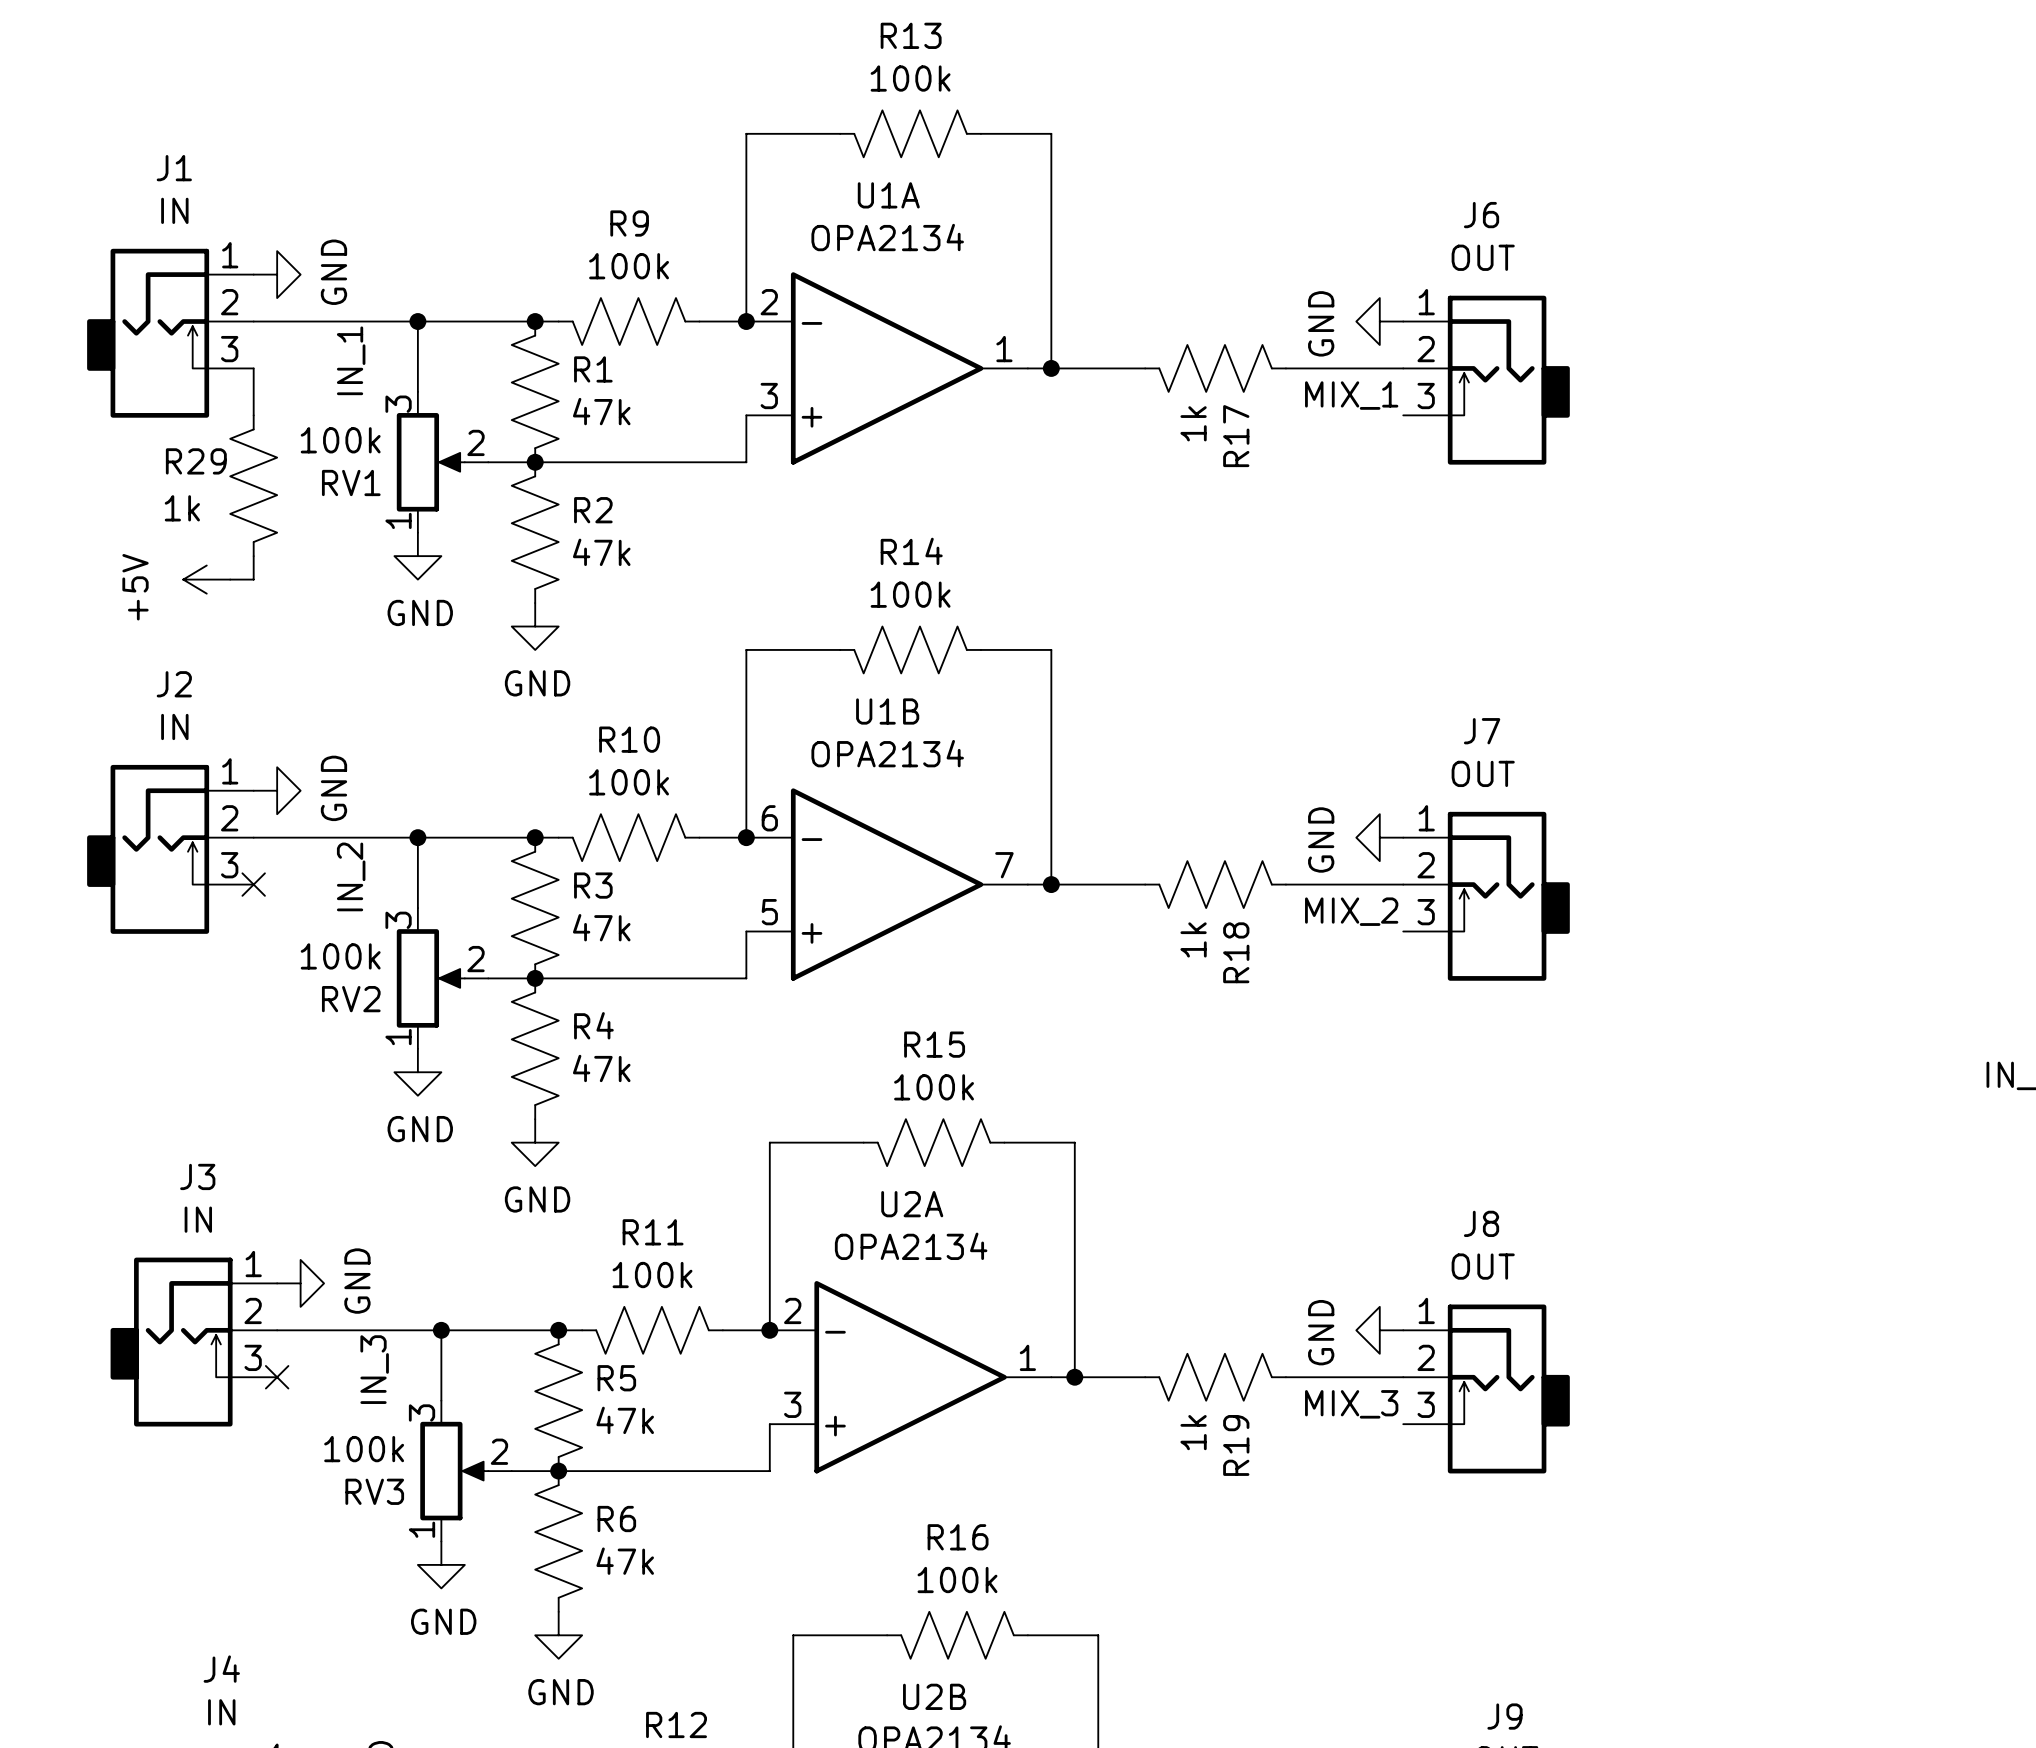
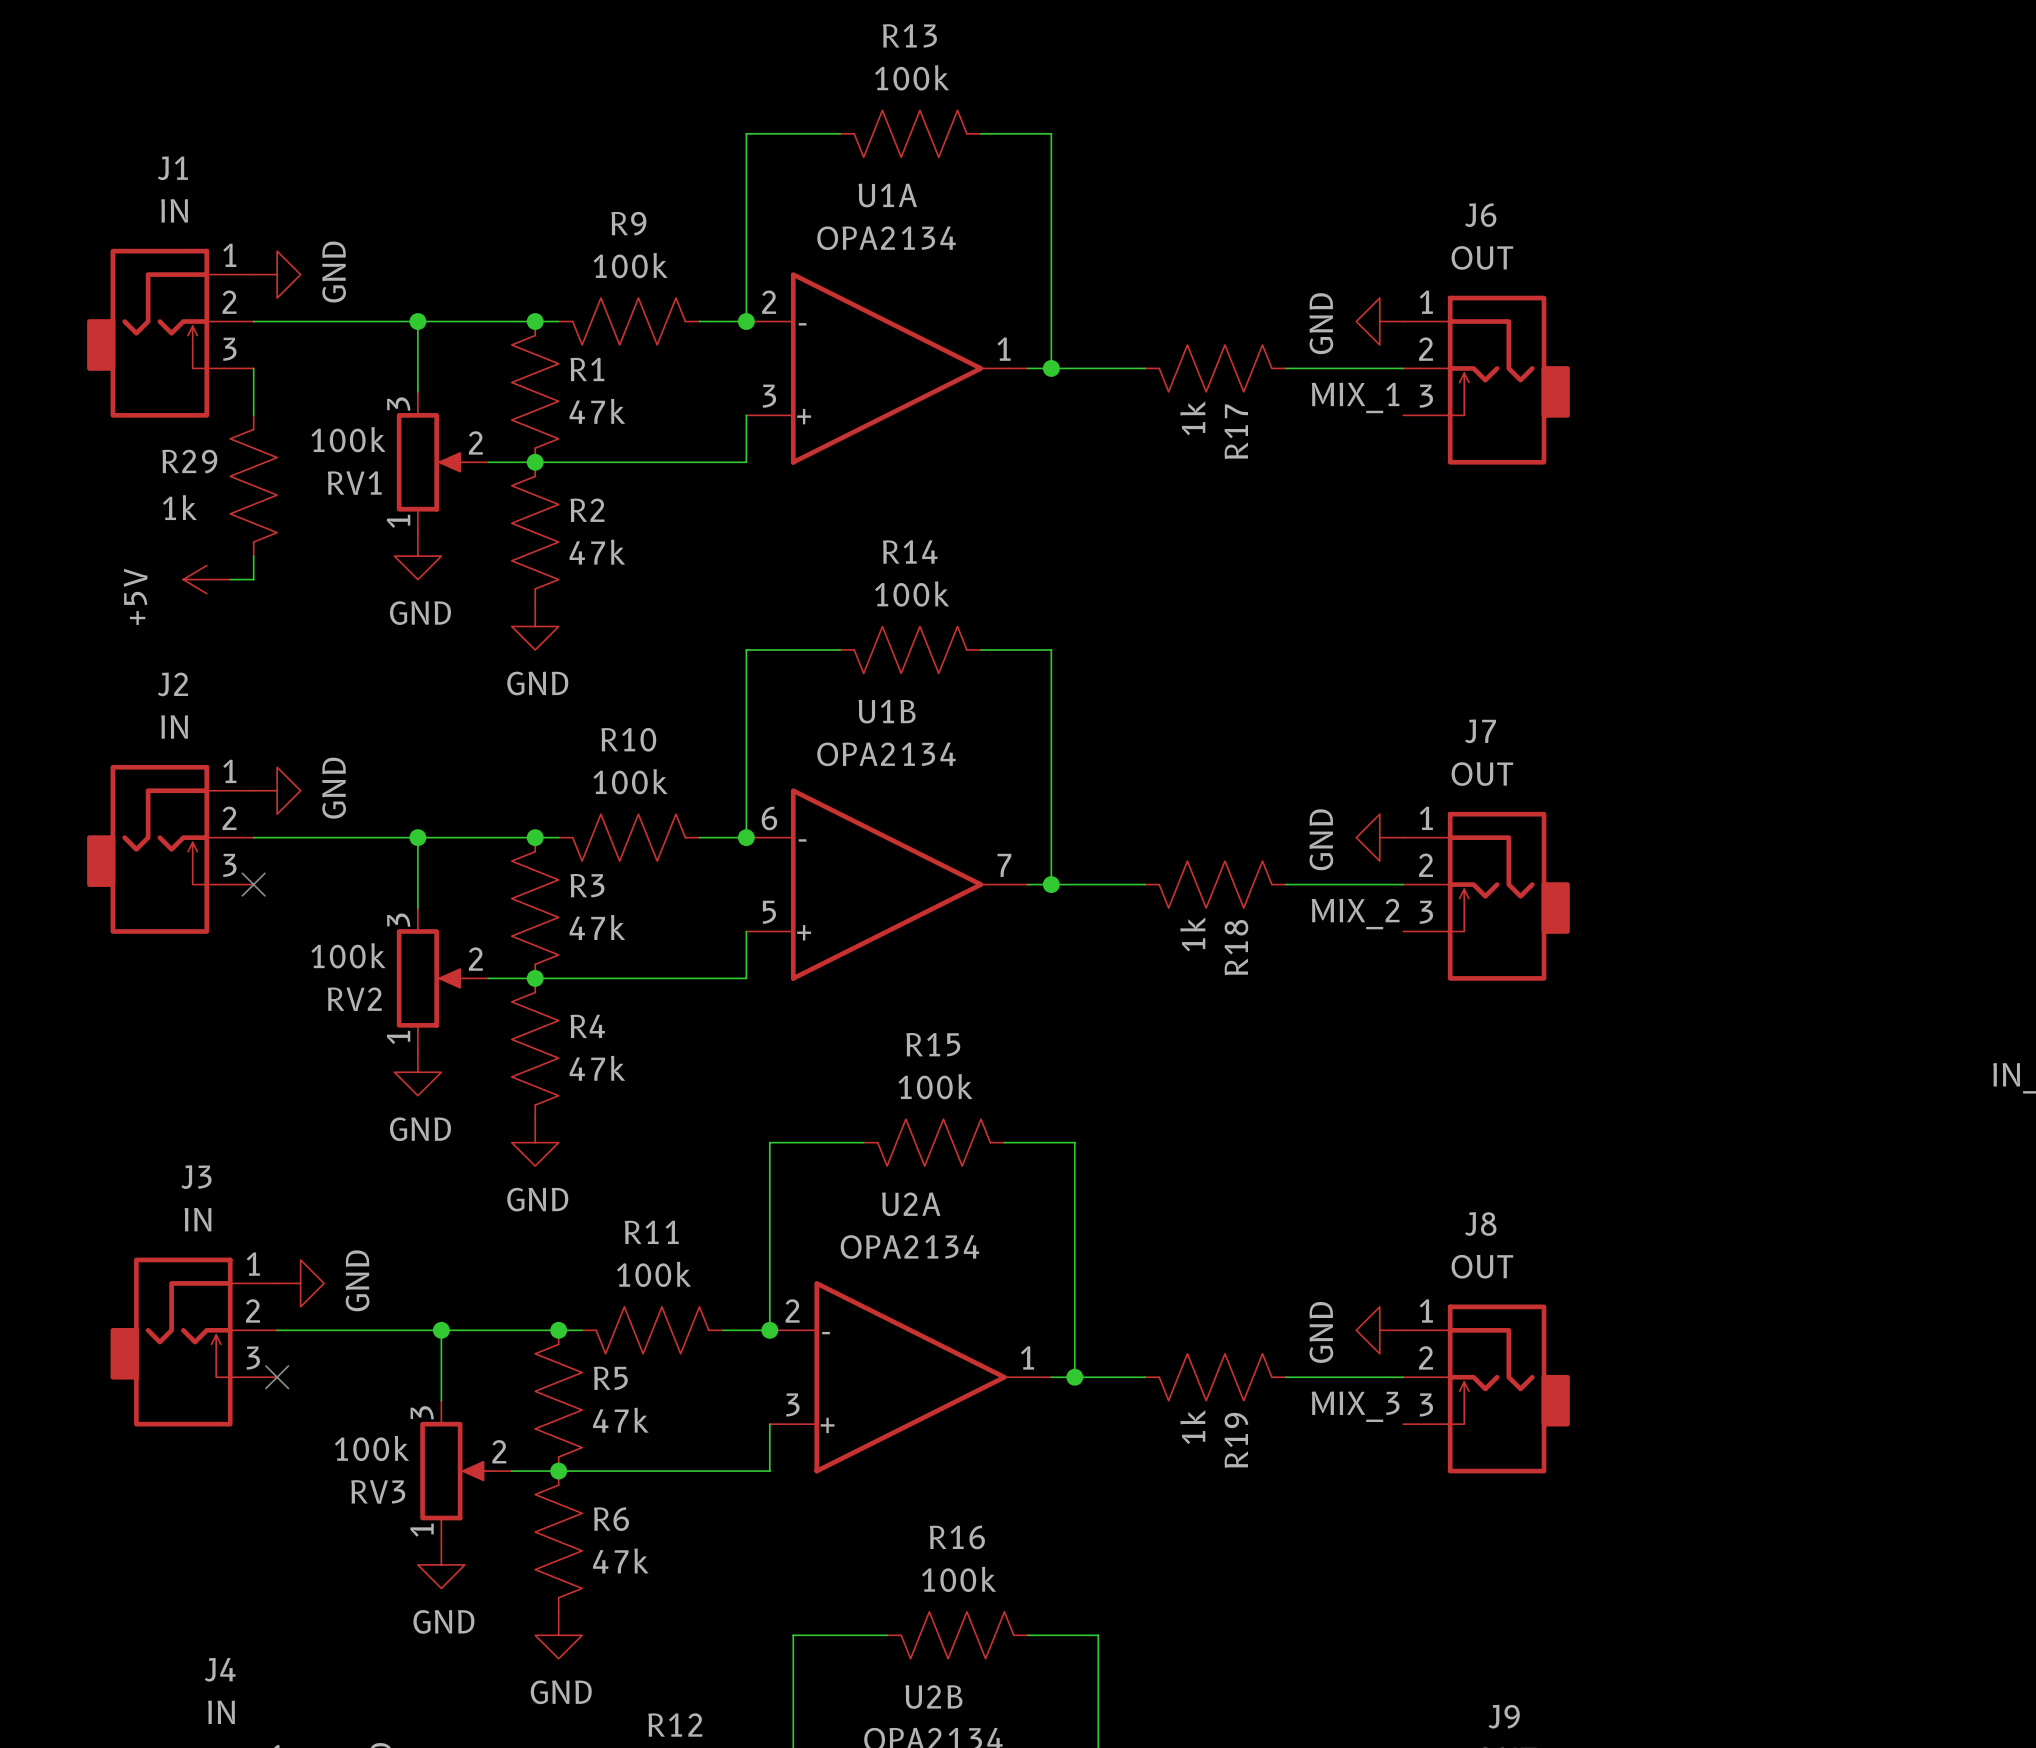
label: IN_1 (351, 360) -> none
label: IN_2 (351, 876) -> none
label: IN_3 (374, 1369) -> none

